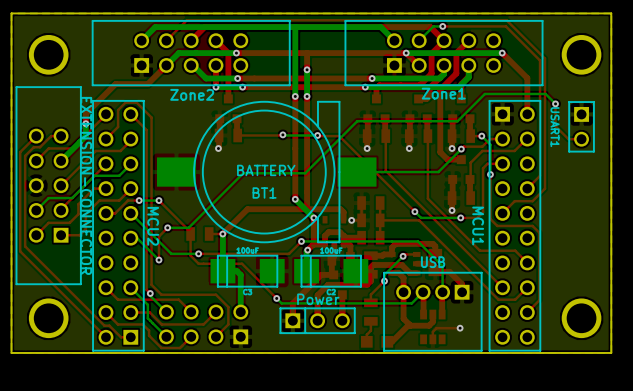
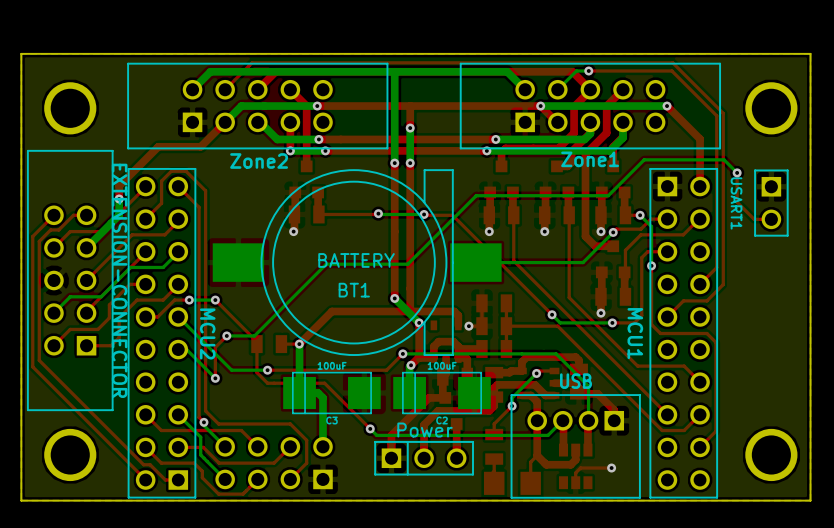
top track: none -> (537, 455) (530, 462) (530, 483)
top track: (409, 324) (391, 341) (387, 341) -> none
part footprint: [360, 335, 394, 348] -> [483, 471, 541, 495]

